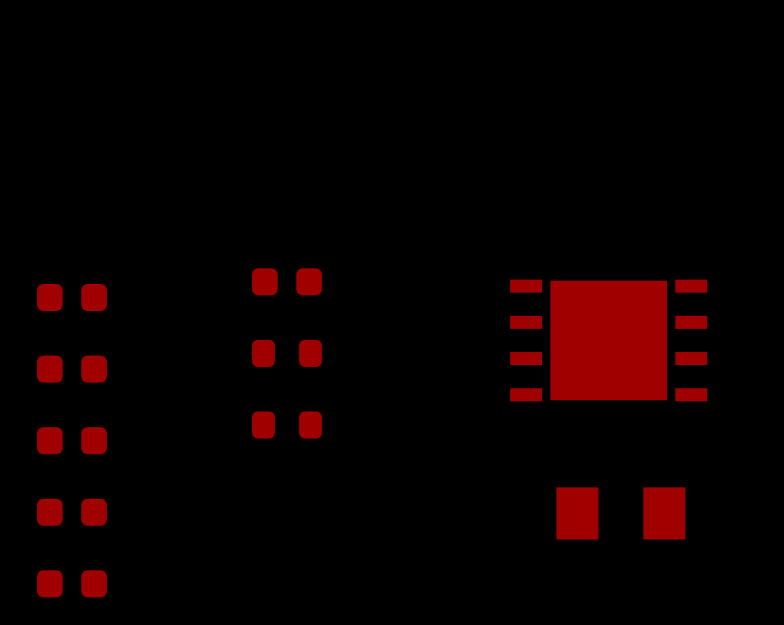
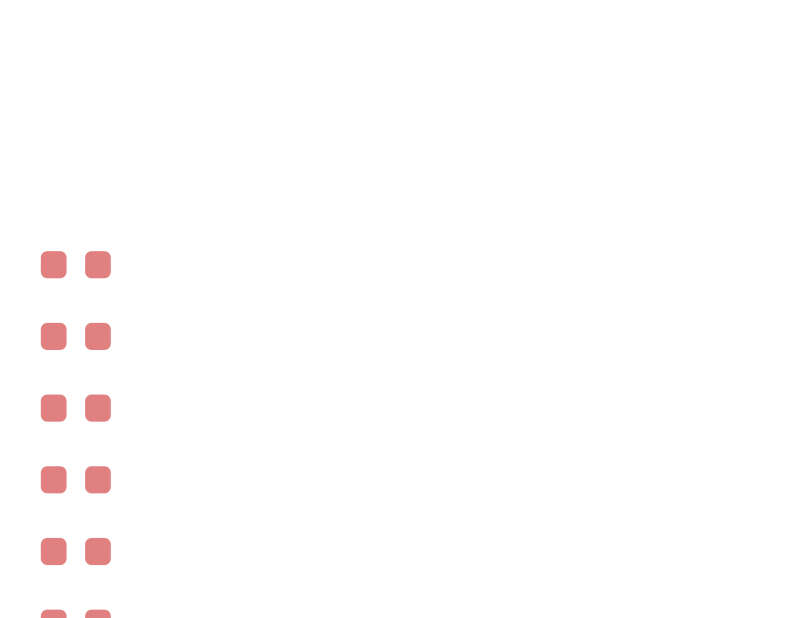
part: (286, 281) -> none
part: (608, 340) -> none
part: (286, 353) -> none
part: (286, 425) -> none
part: (620, 513) -> none

